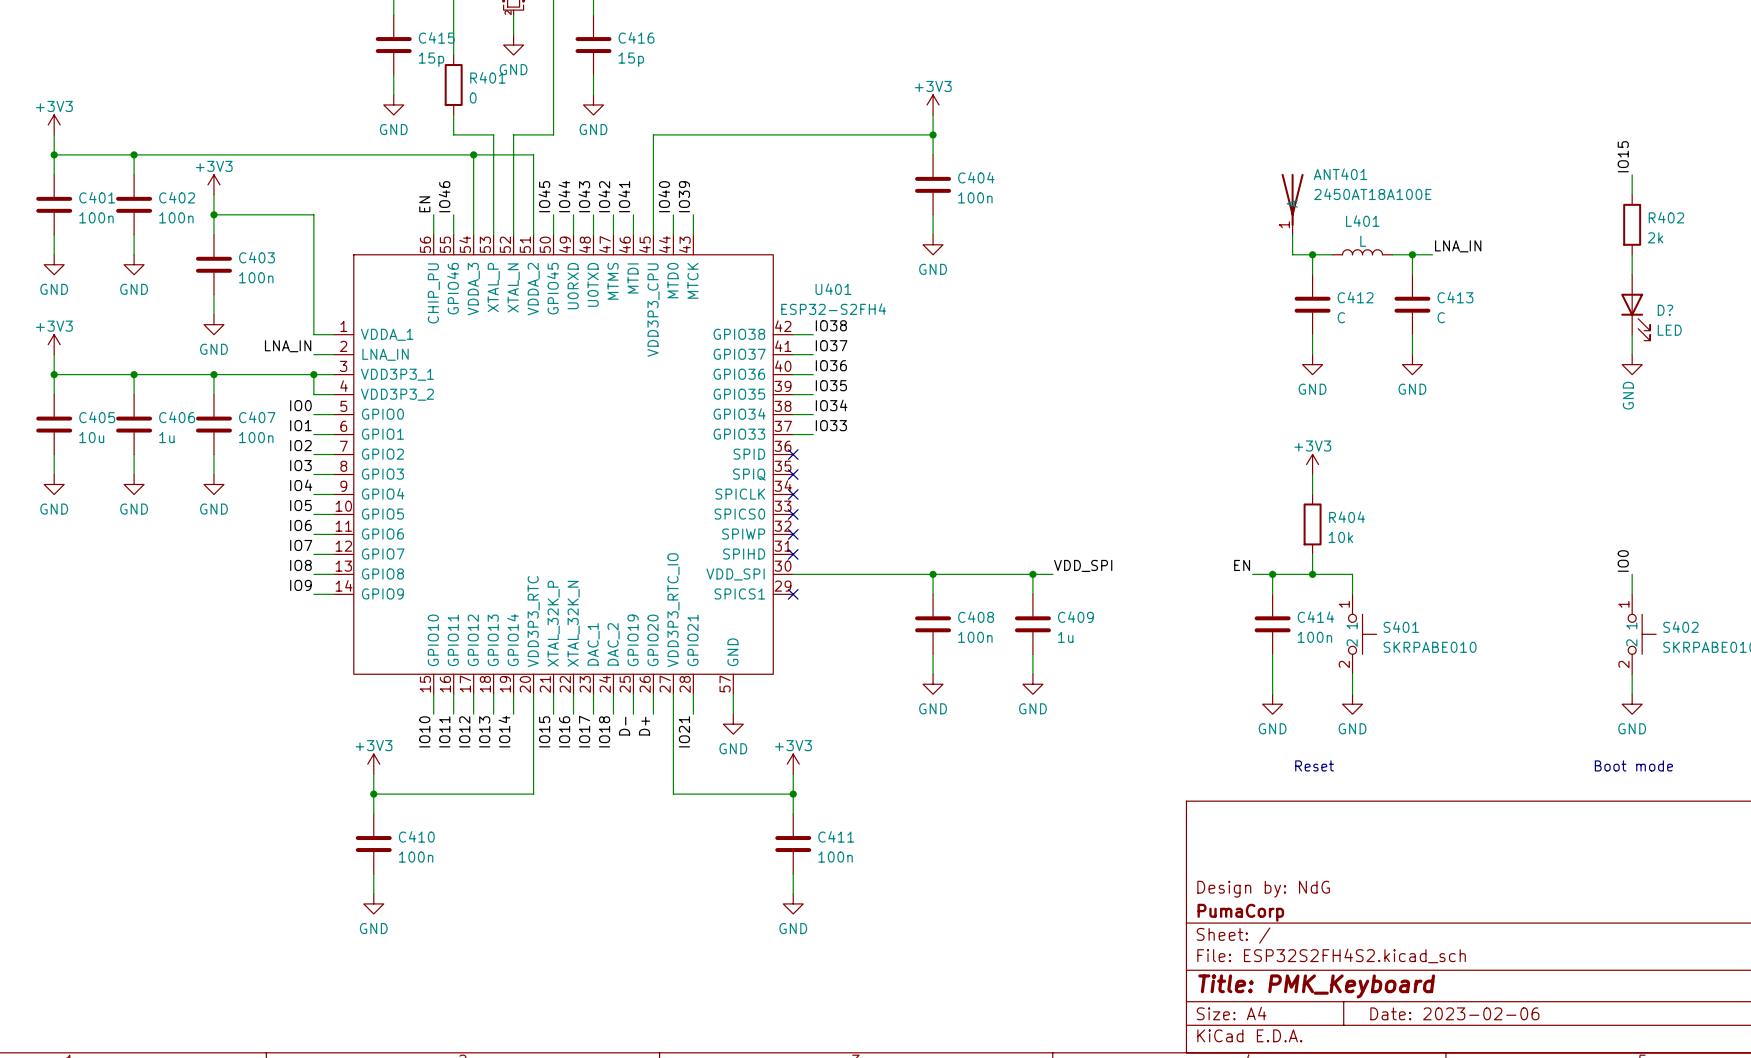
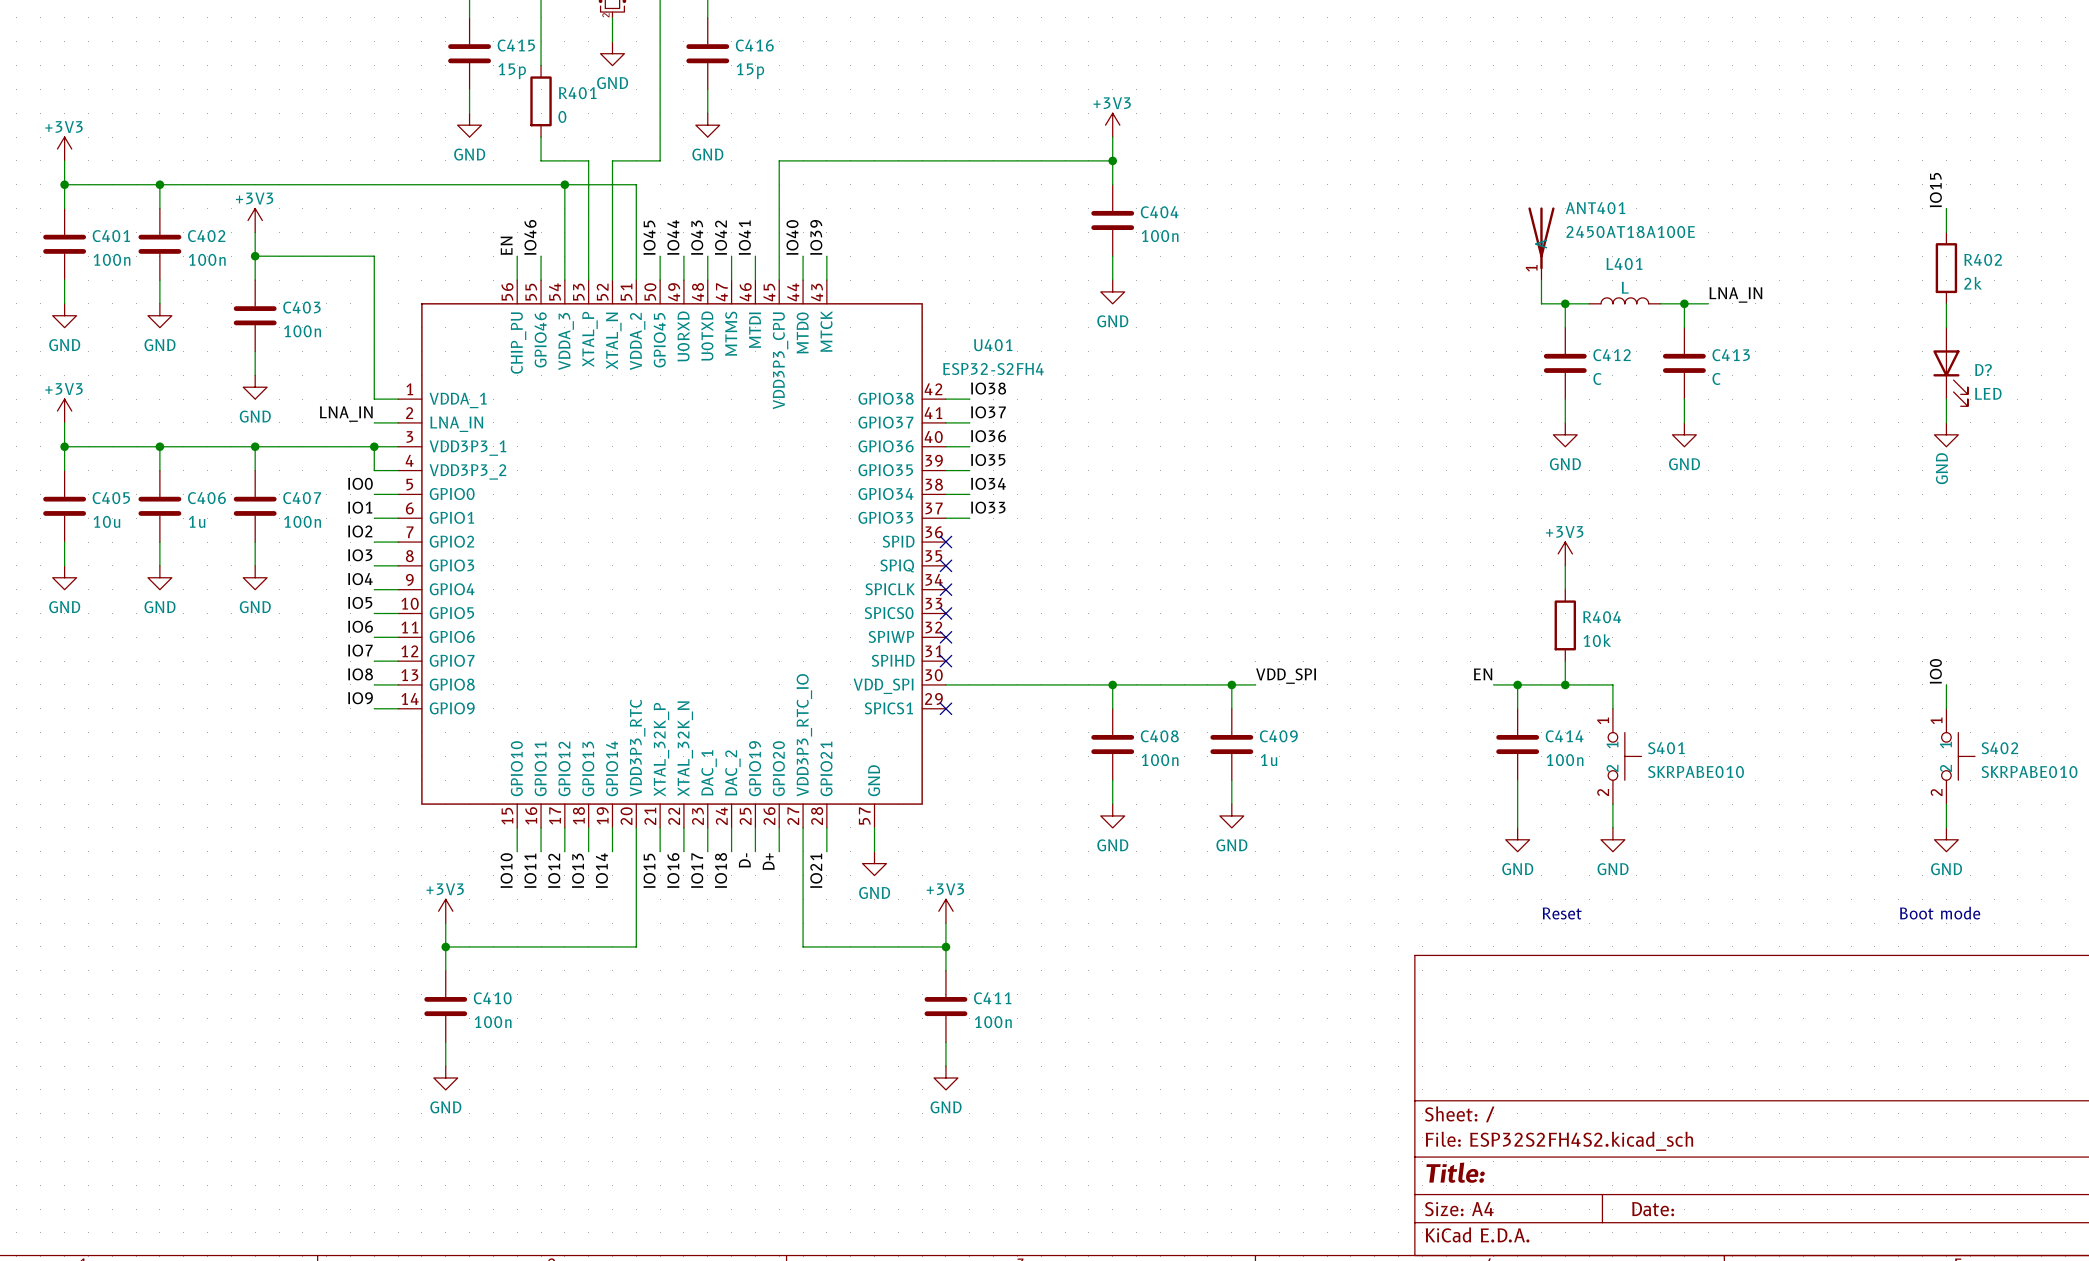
title block: Design by: NdG (1263, 889) -> none
title block: PumaCorp (1240, 912) -> none
title block: Title: PMK_Keyboard (1316, 986) -> Title: (1455, 1172)
title block: Date: 2023-02-06 (1454, 1013) -> Date: (1653, 1209)

